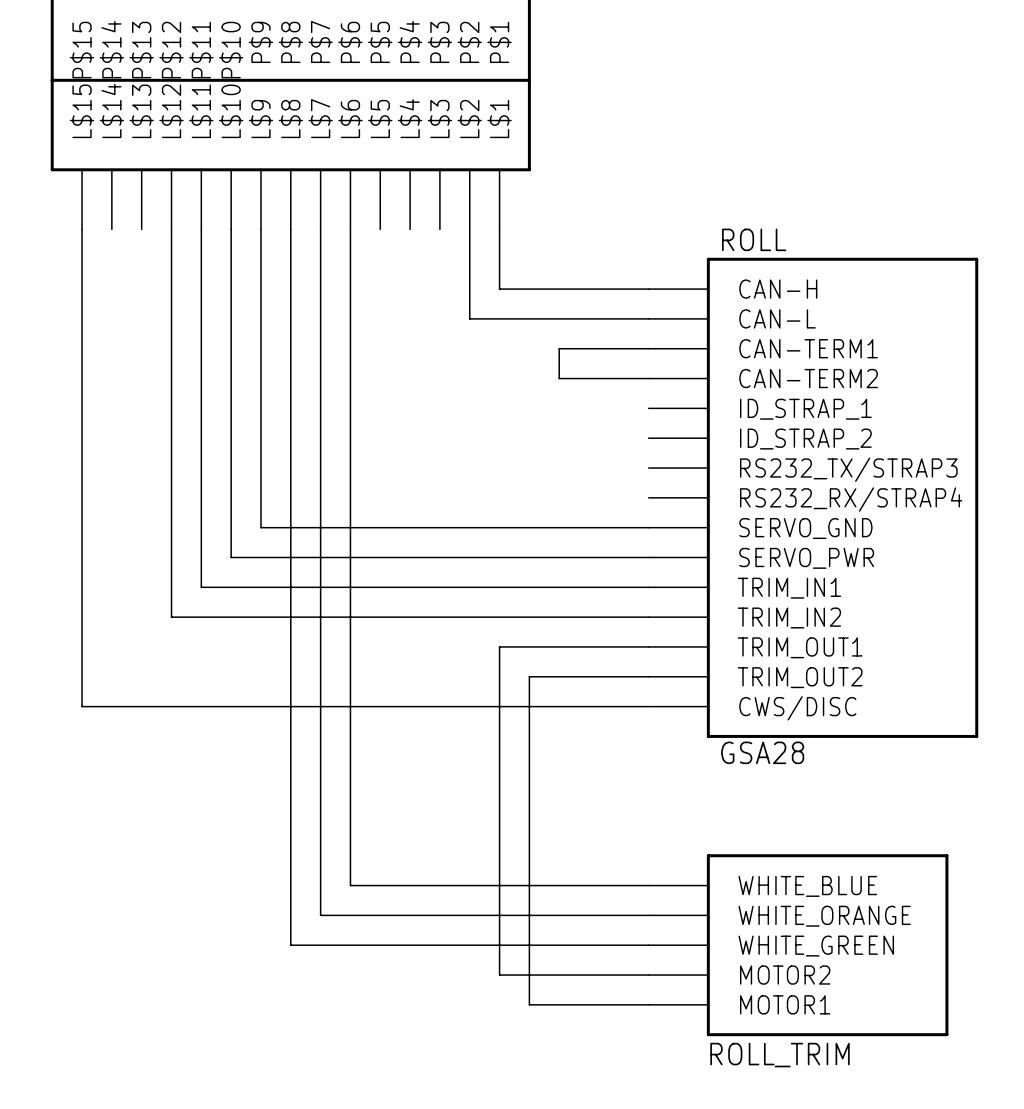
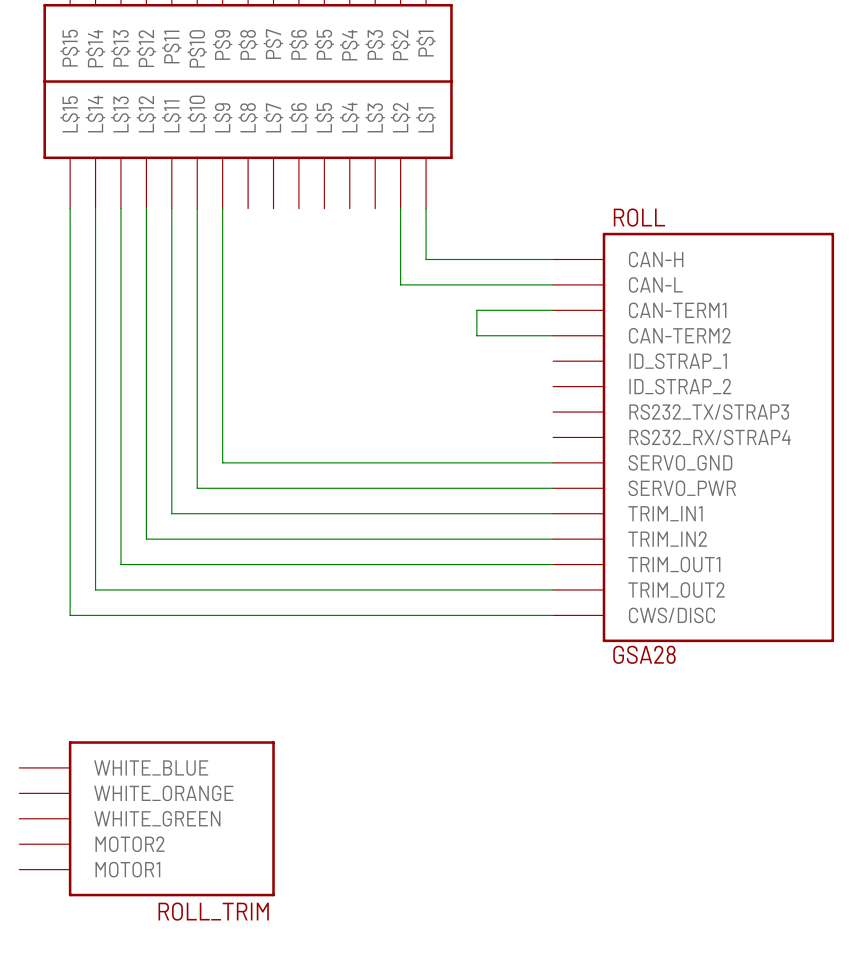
wire: (290, 229) (290, 945) (648, 945) -> none
wire: (320, 229) (320, 915) (648, 915) -> none
wire: (350, 229) (350, 885) (648, 885) -> none
wire: (499, 646) (499, 975) (648, 975) -> (426, 564) (120, 564) (120, 208)
wire: (529, 676) (529, 1004) (648, 1004) -> (451, 589) (95, 589) (95, 208)
ROLL_TRIM: none -> (147, 818)
ROLL_TRIM: (798, 945) -> none

